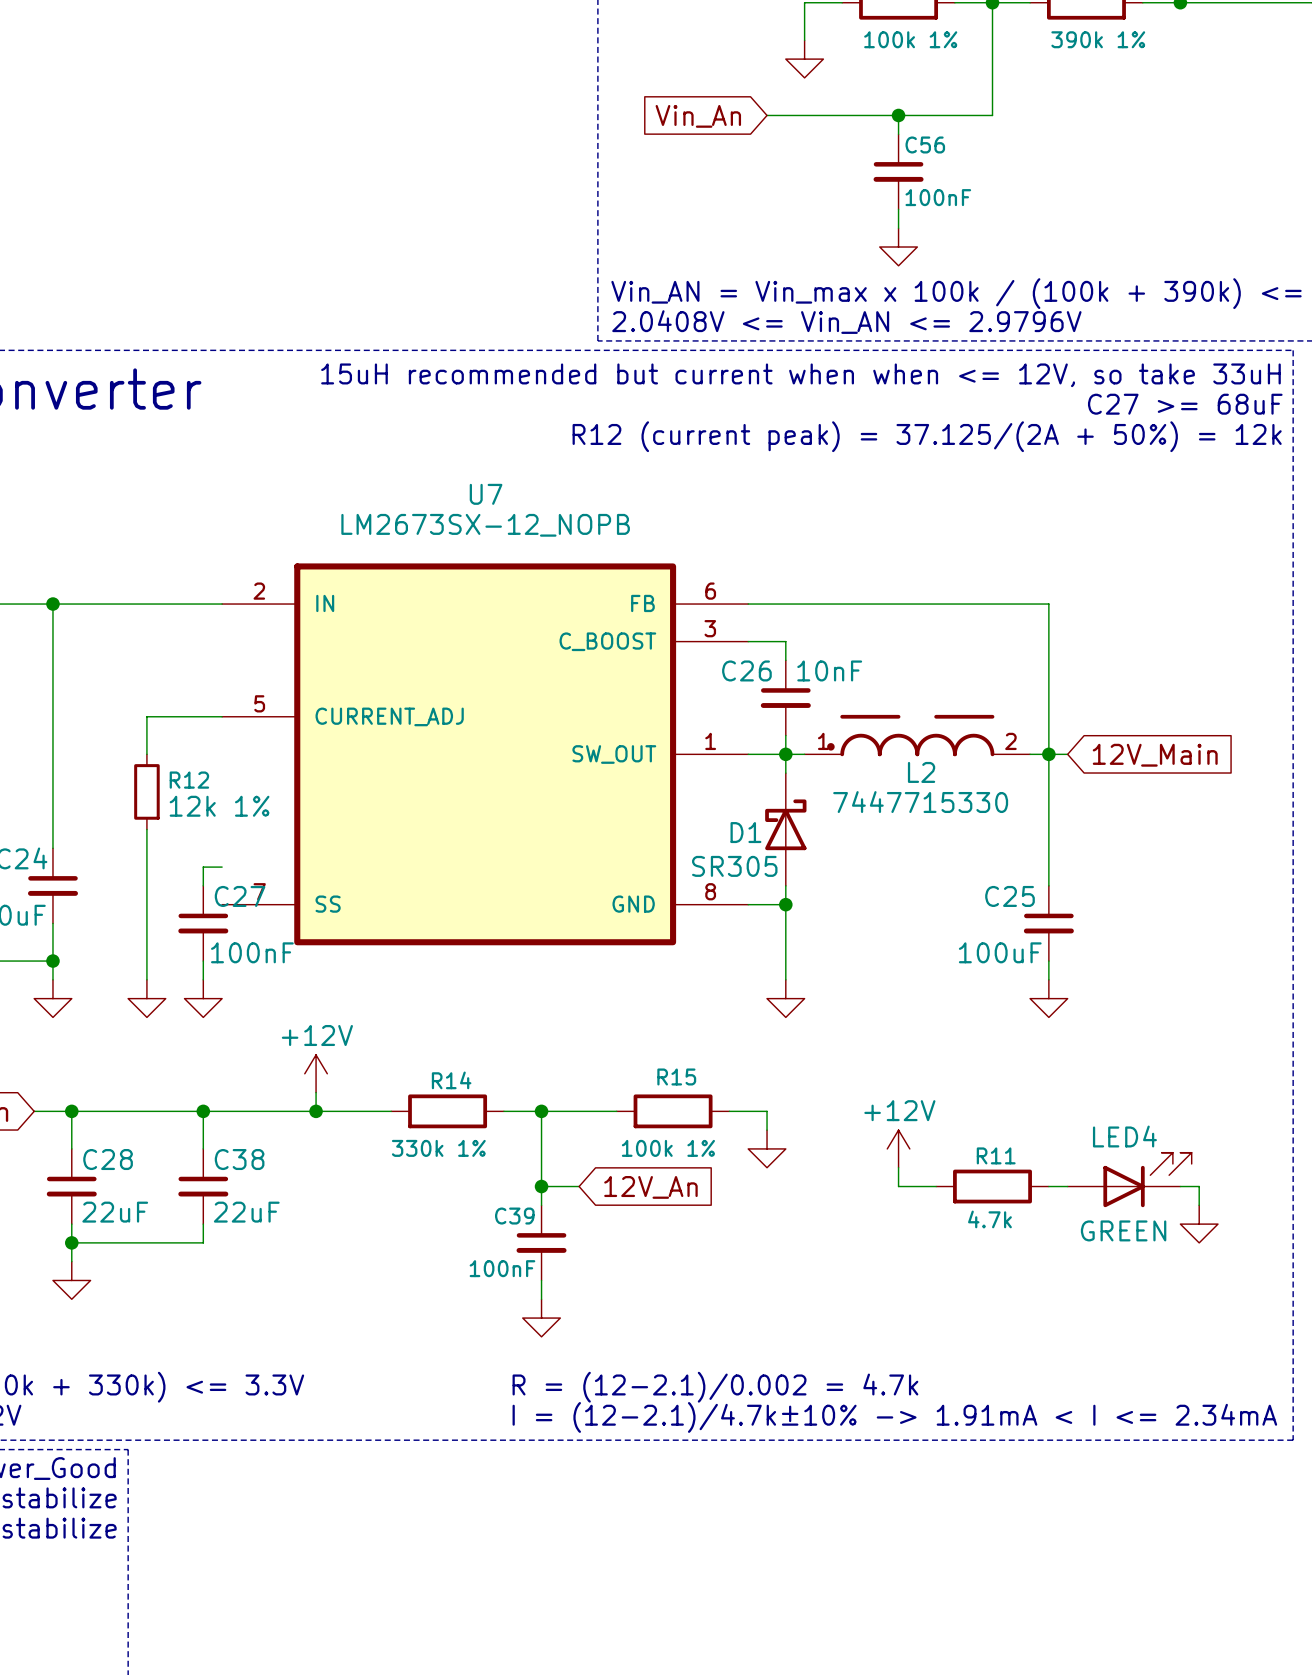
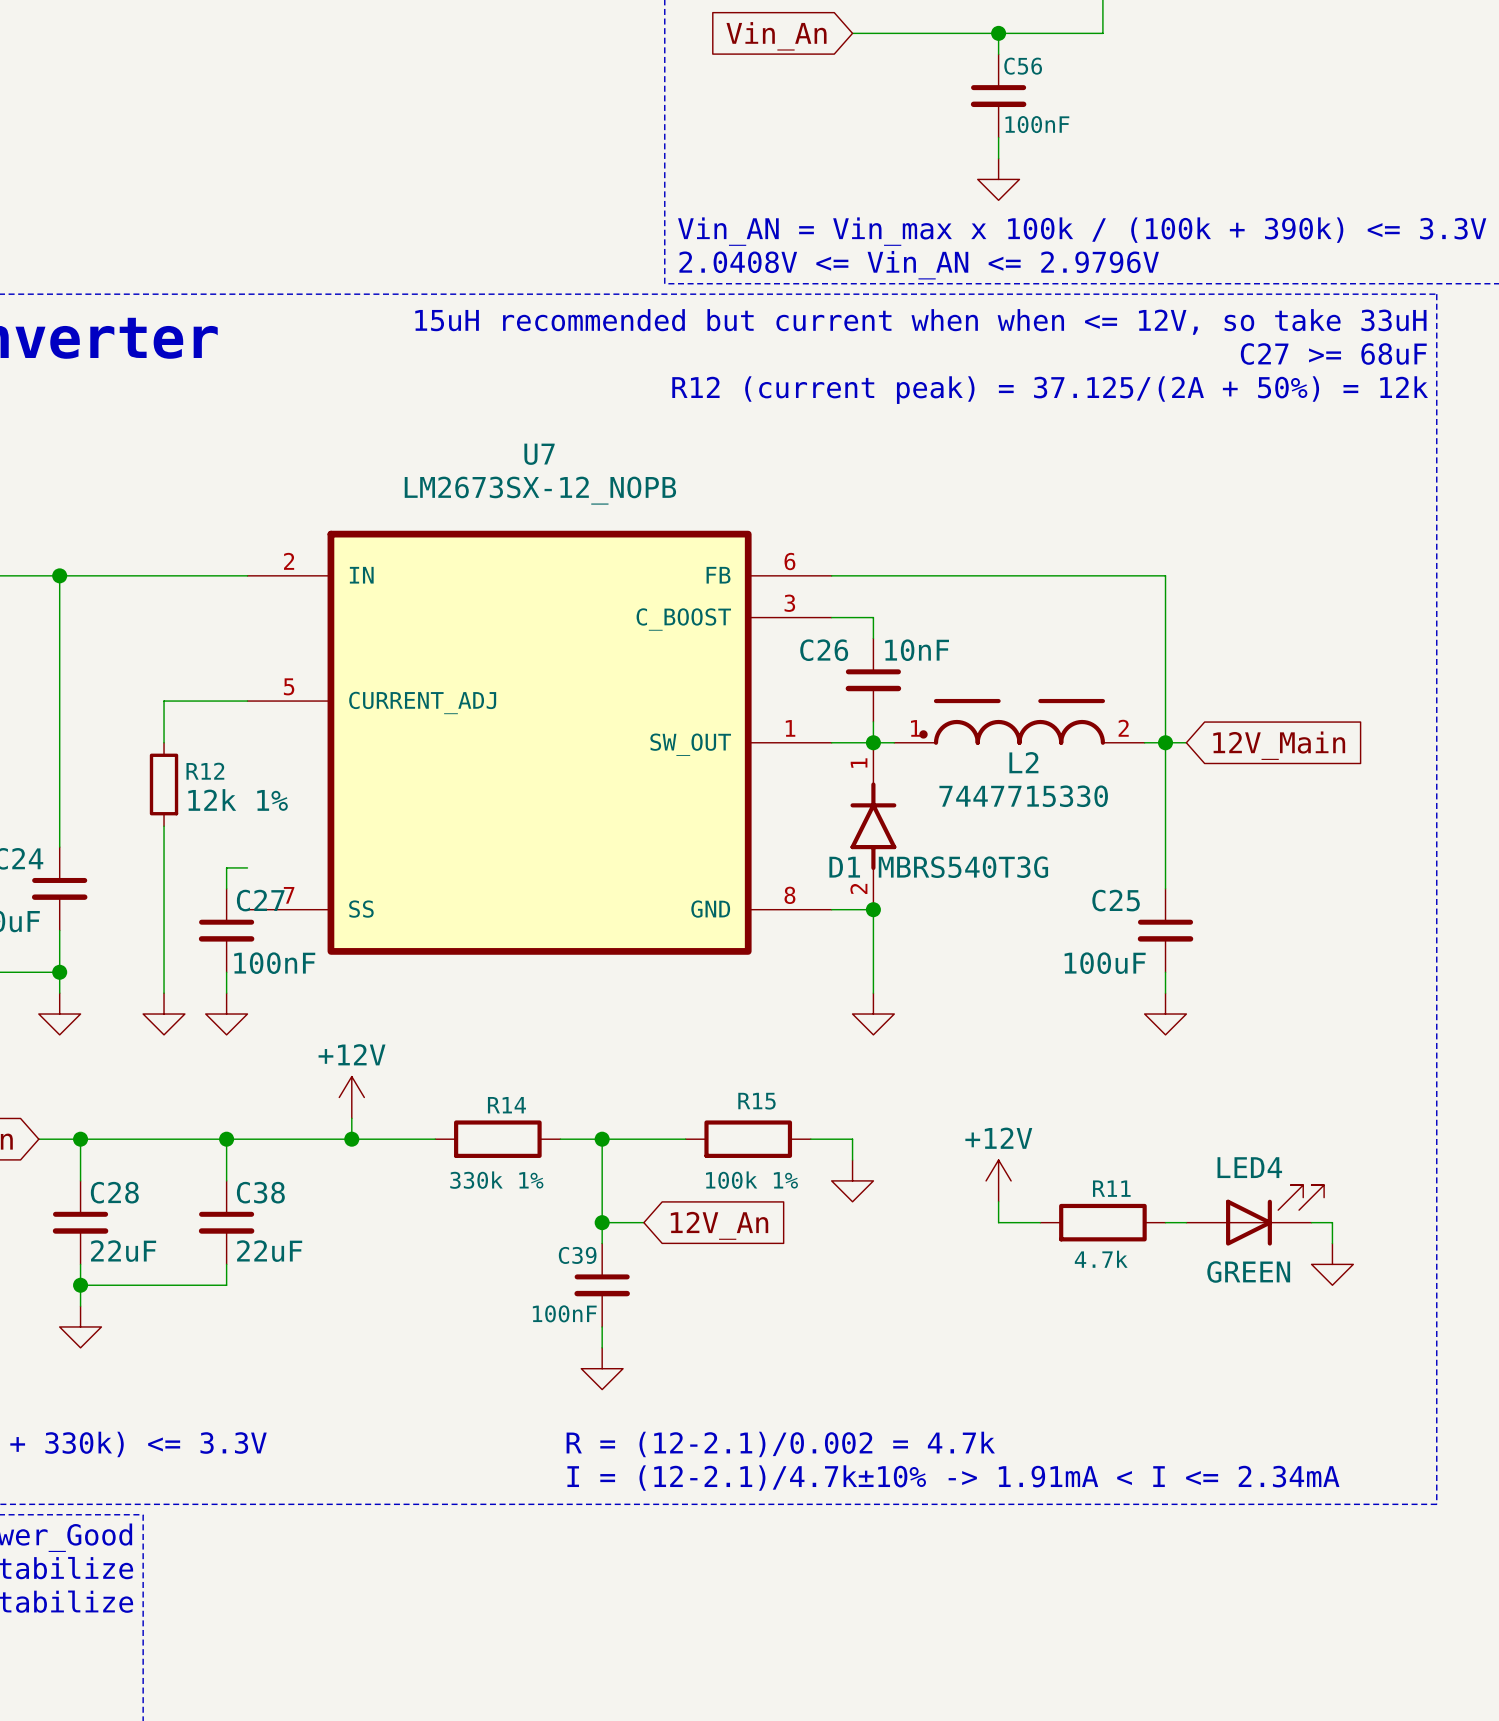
D1 symbol: [765, 773, 807, 886] -> [850, 742, 897, 910]
D1 name position: D1 (745, 832) -> D1 (844, 867)
D1 value: SR305 (734, 866) -> MBRS540T3G (963, 867)

